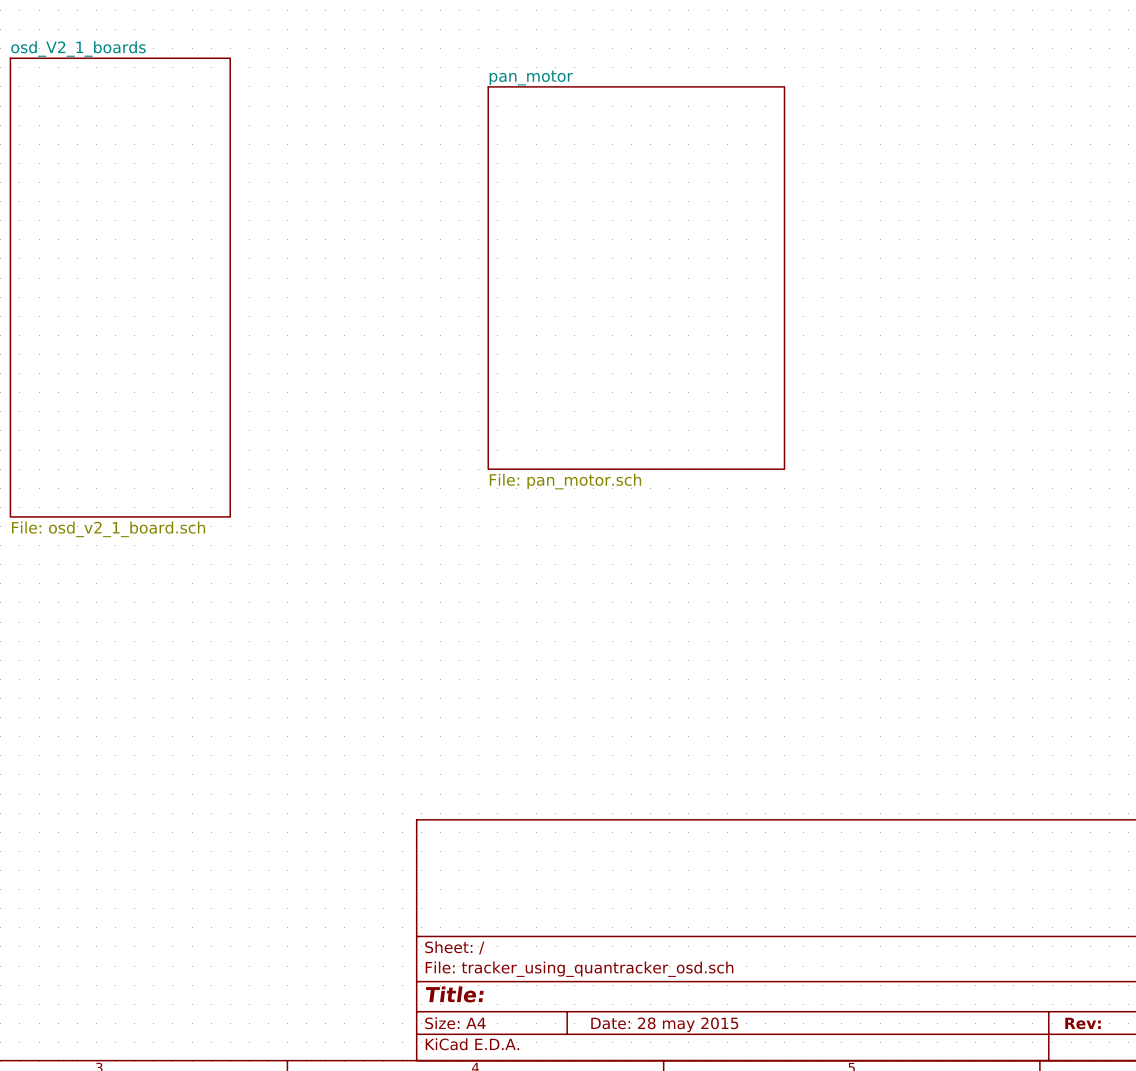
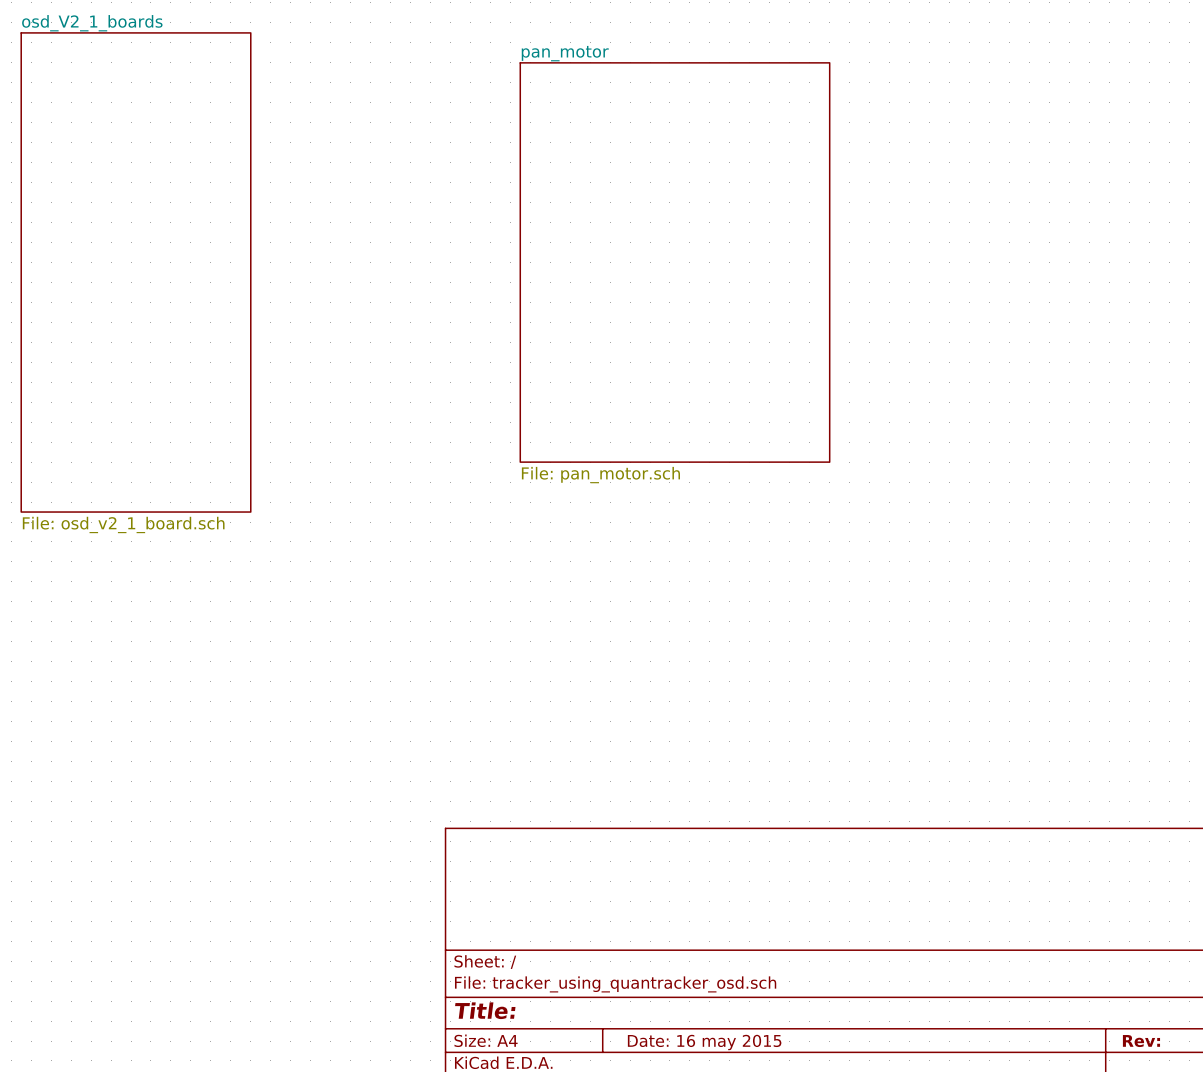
title block: Date: 28 may 2015 (664, 1024) -> Date: 16 may 2015 (704, 1042)

